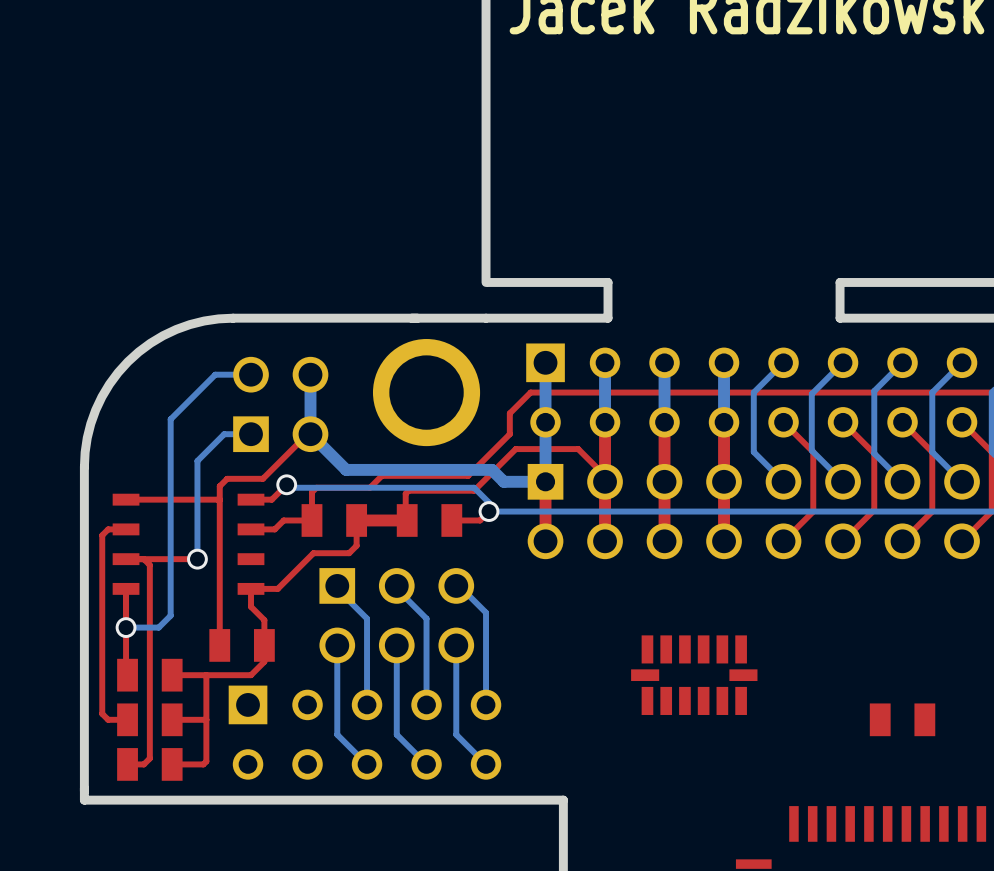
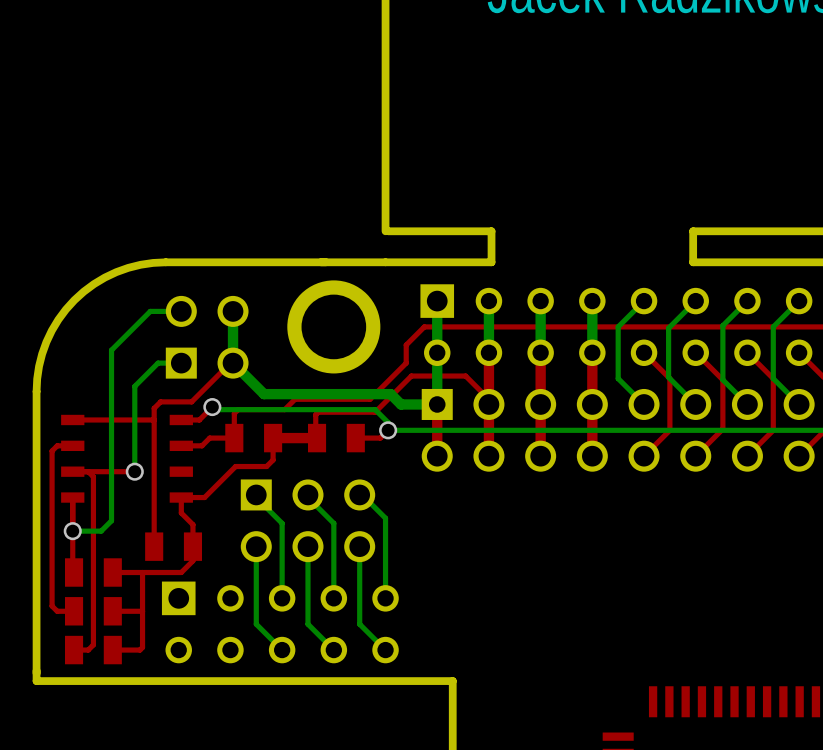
part: (694, 675) -> none
part: (902, 719) -> none

